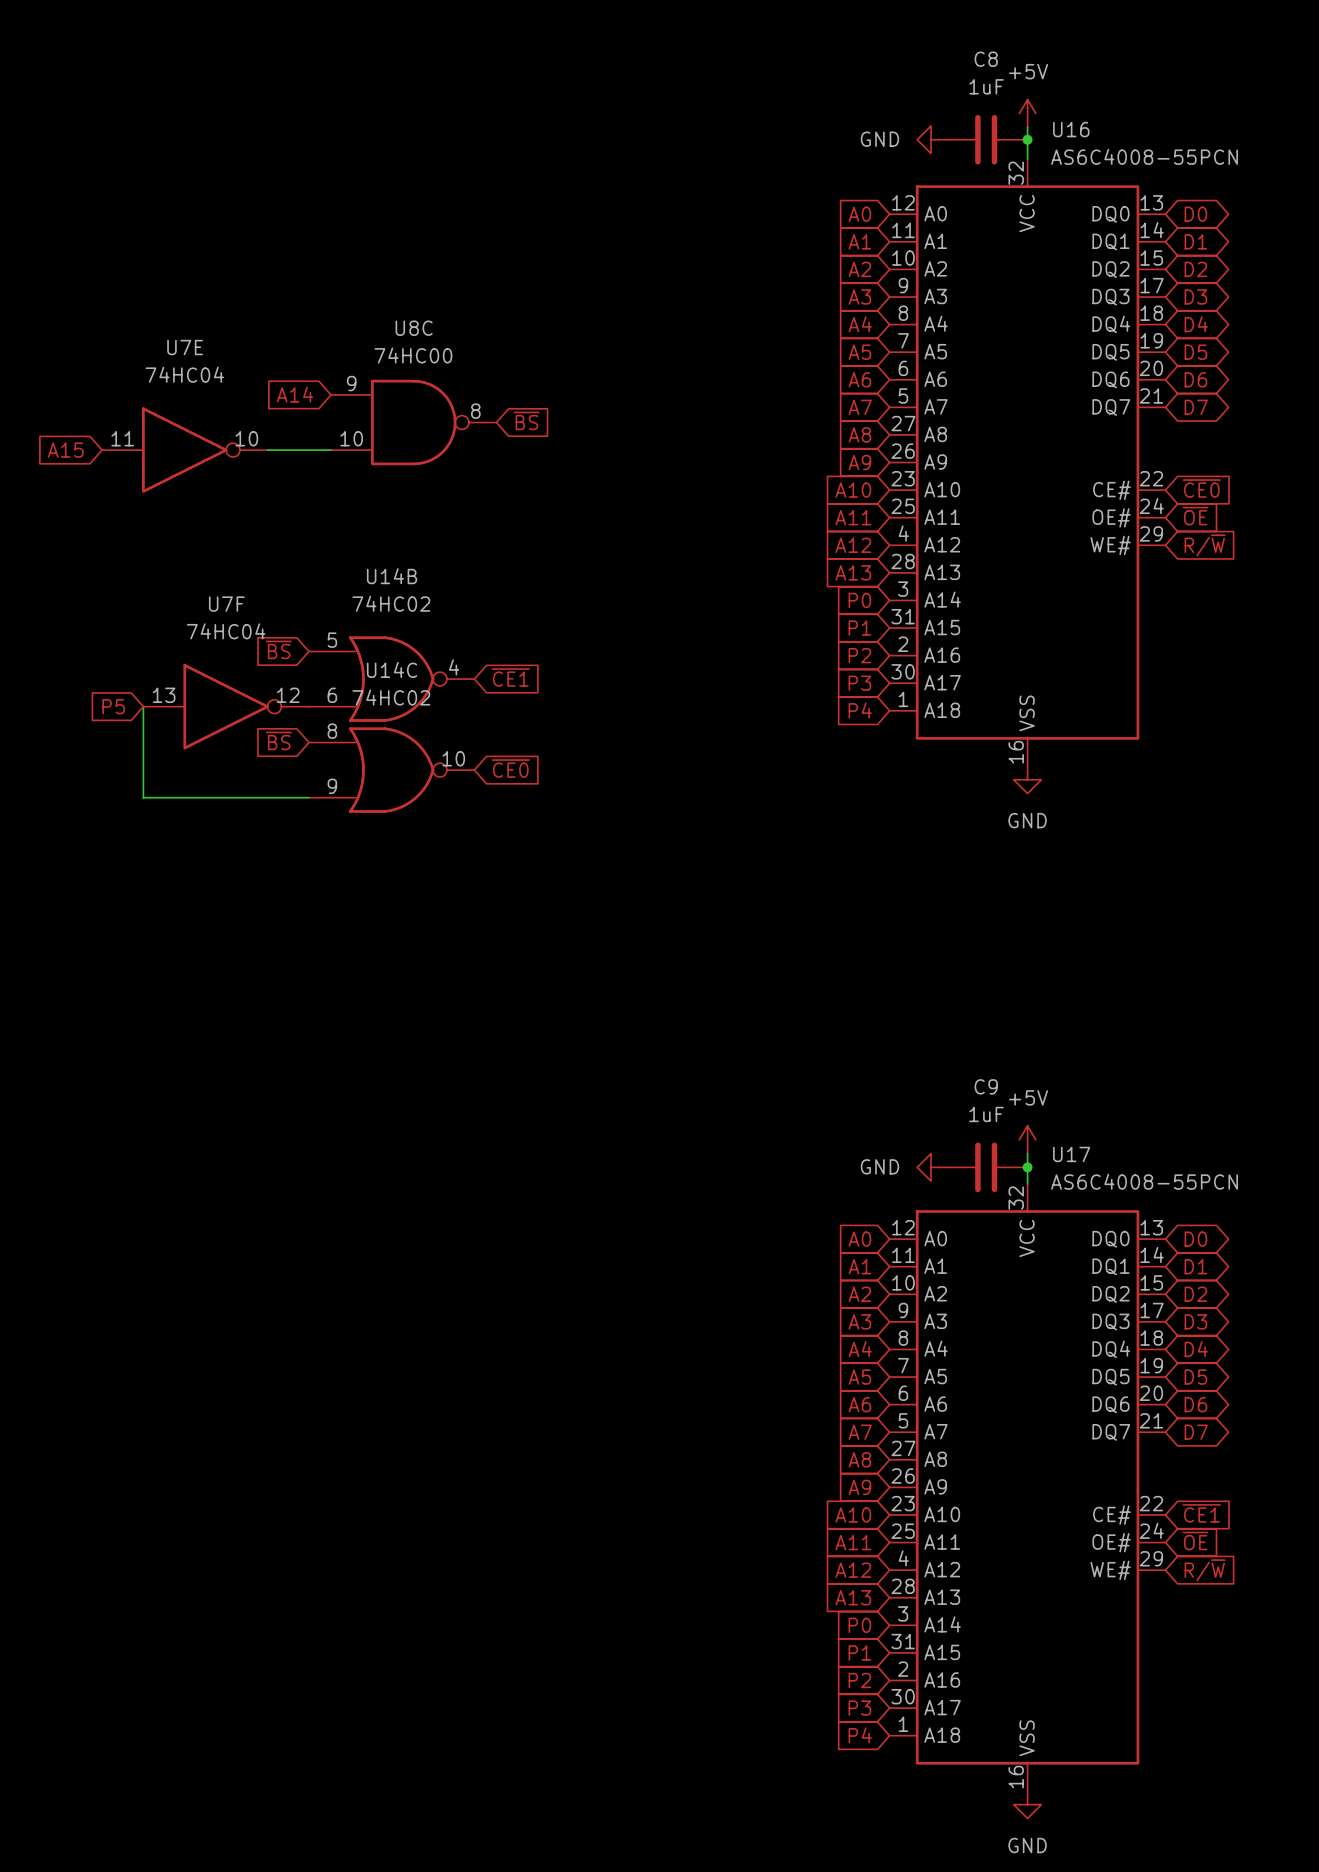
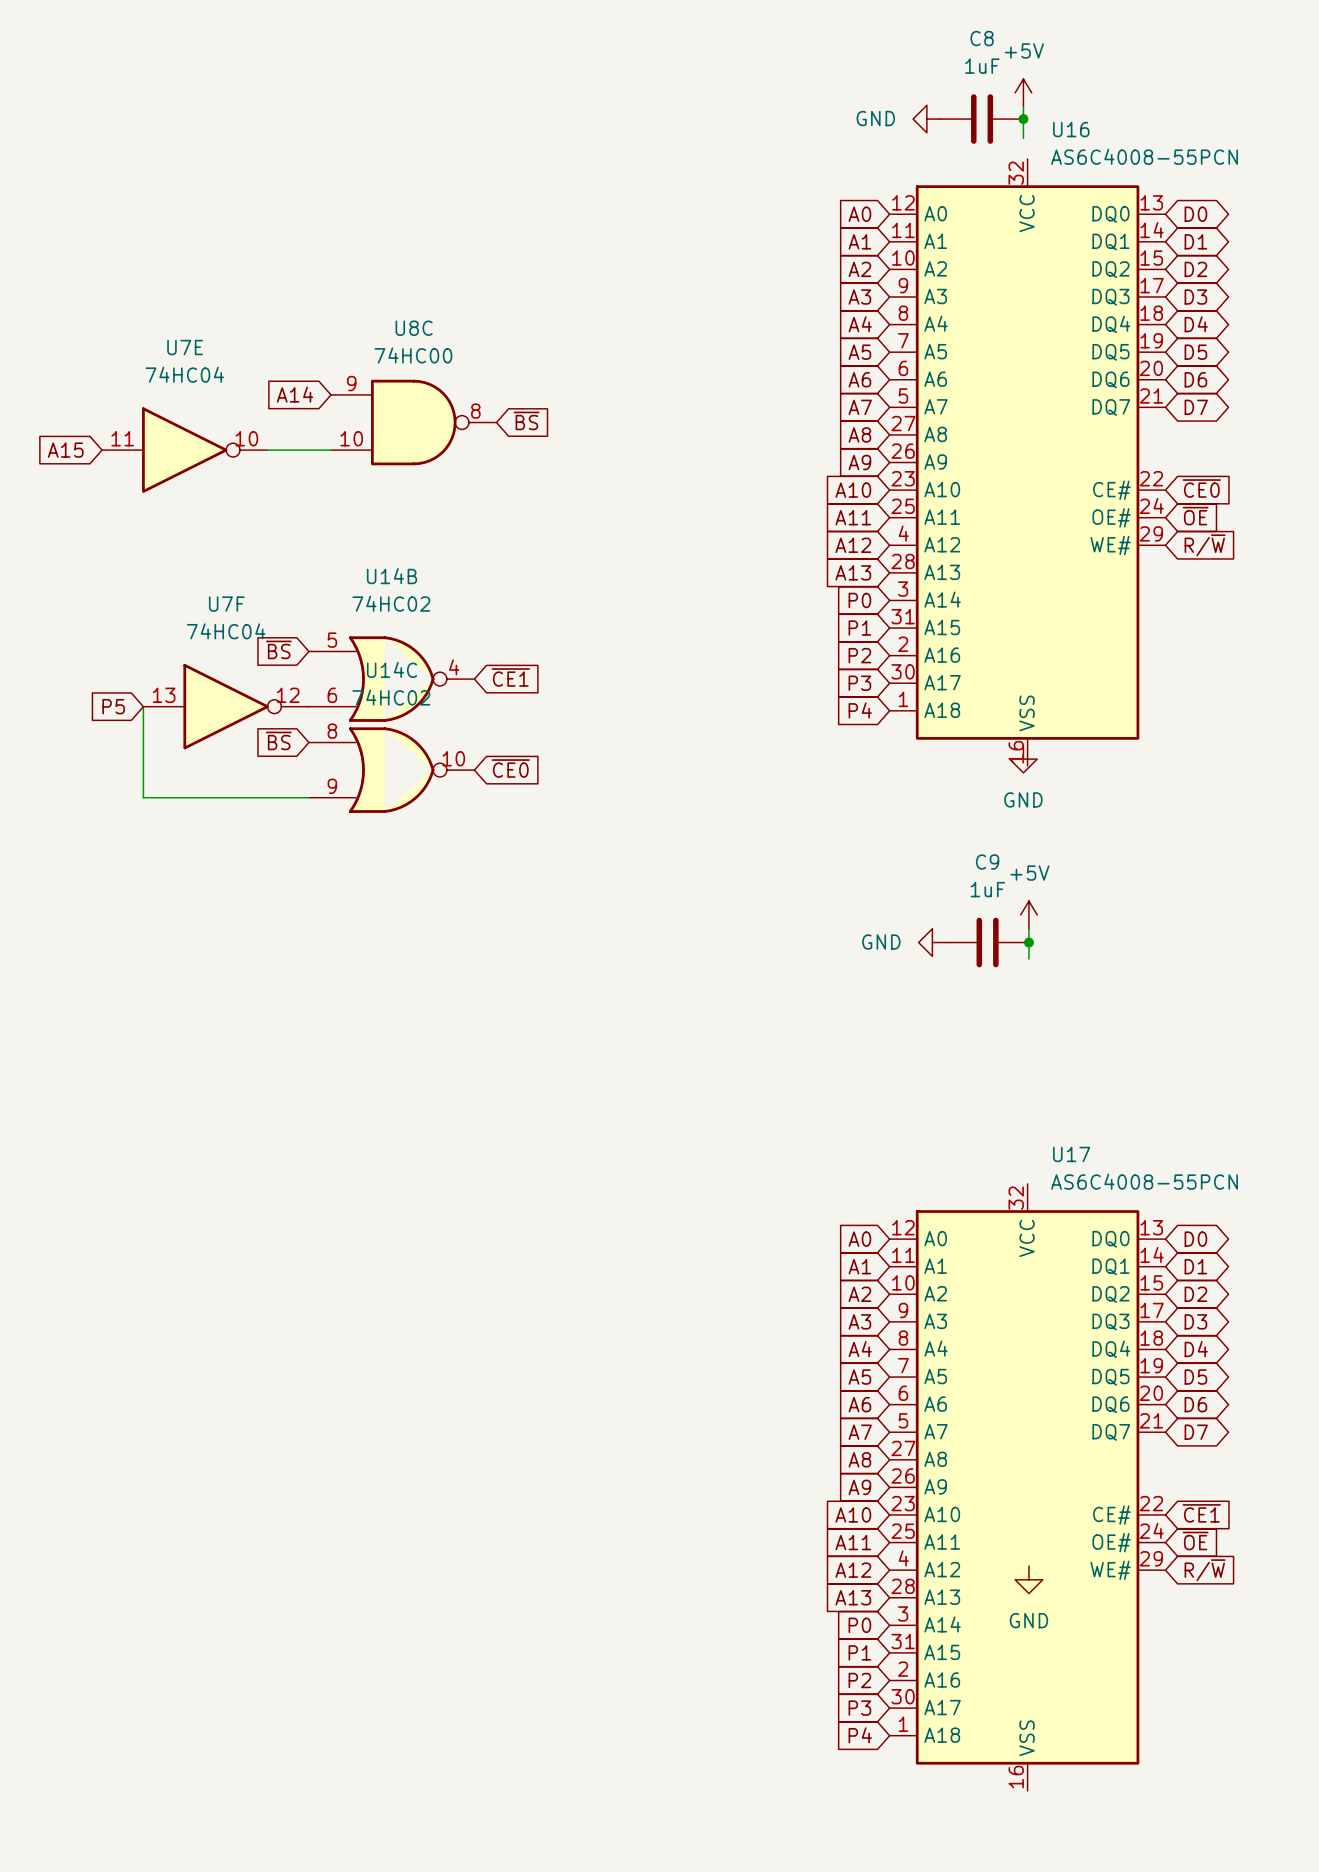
power symbol position: +5V (1027, 113) -> +5V (1023, 92)
wire: (1027, 127) (1027, 159) -> (1023, 106) (1023, 138)
power symbol position: GND (931, 139) -> GND (926, 119)
C8 position: (986, 139) -> (982, 119)
junction position: (1027, 139) -> (1023, 119)
power symbol position: GND (1027, 779) -> GND (1023, 759)
power symbol: none -> GND (932, 942)
junction: none -> (1028, 942)
power symbol position: +5V (1027, 1139) -> +5V (1028, 914)
wire: (1027, 1153) (1027, 1183) -> (1028, 928) (1028, 959)
power symbol: GND (931, 1167) -> none
C9 position: (986, 1167) -> (987, 942)
junction: (1027, 1167) -> none
power symbol: none -> GND (1028, 1579)
power symbol: GND (1027, 1804) -> none

